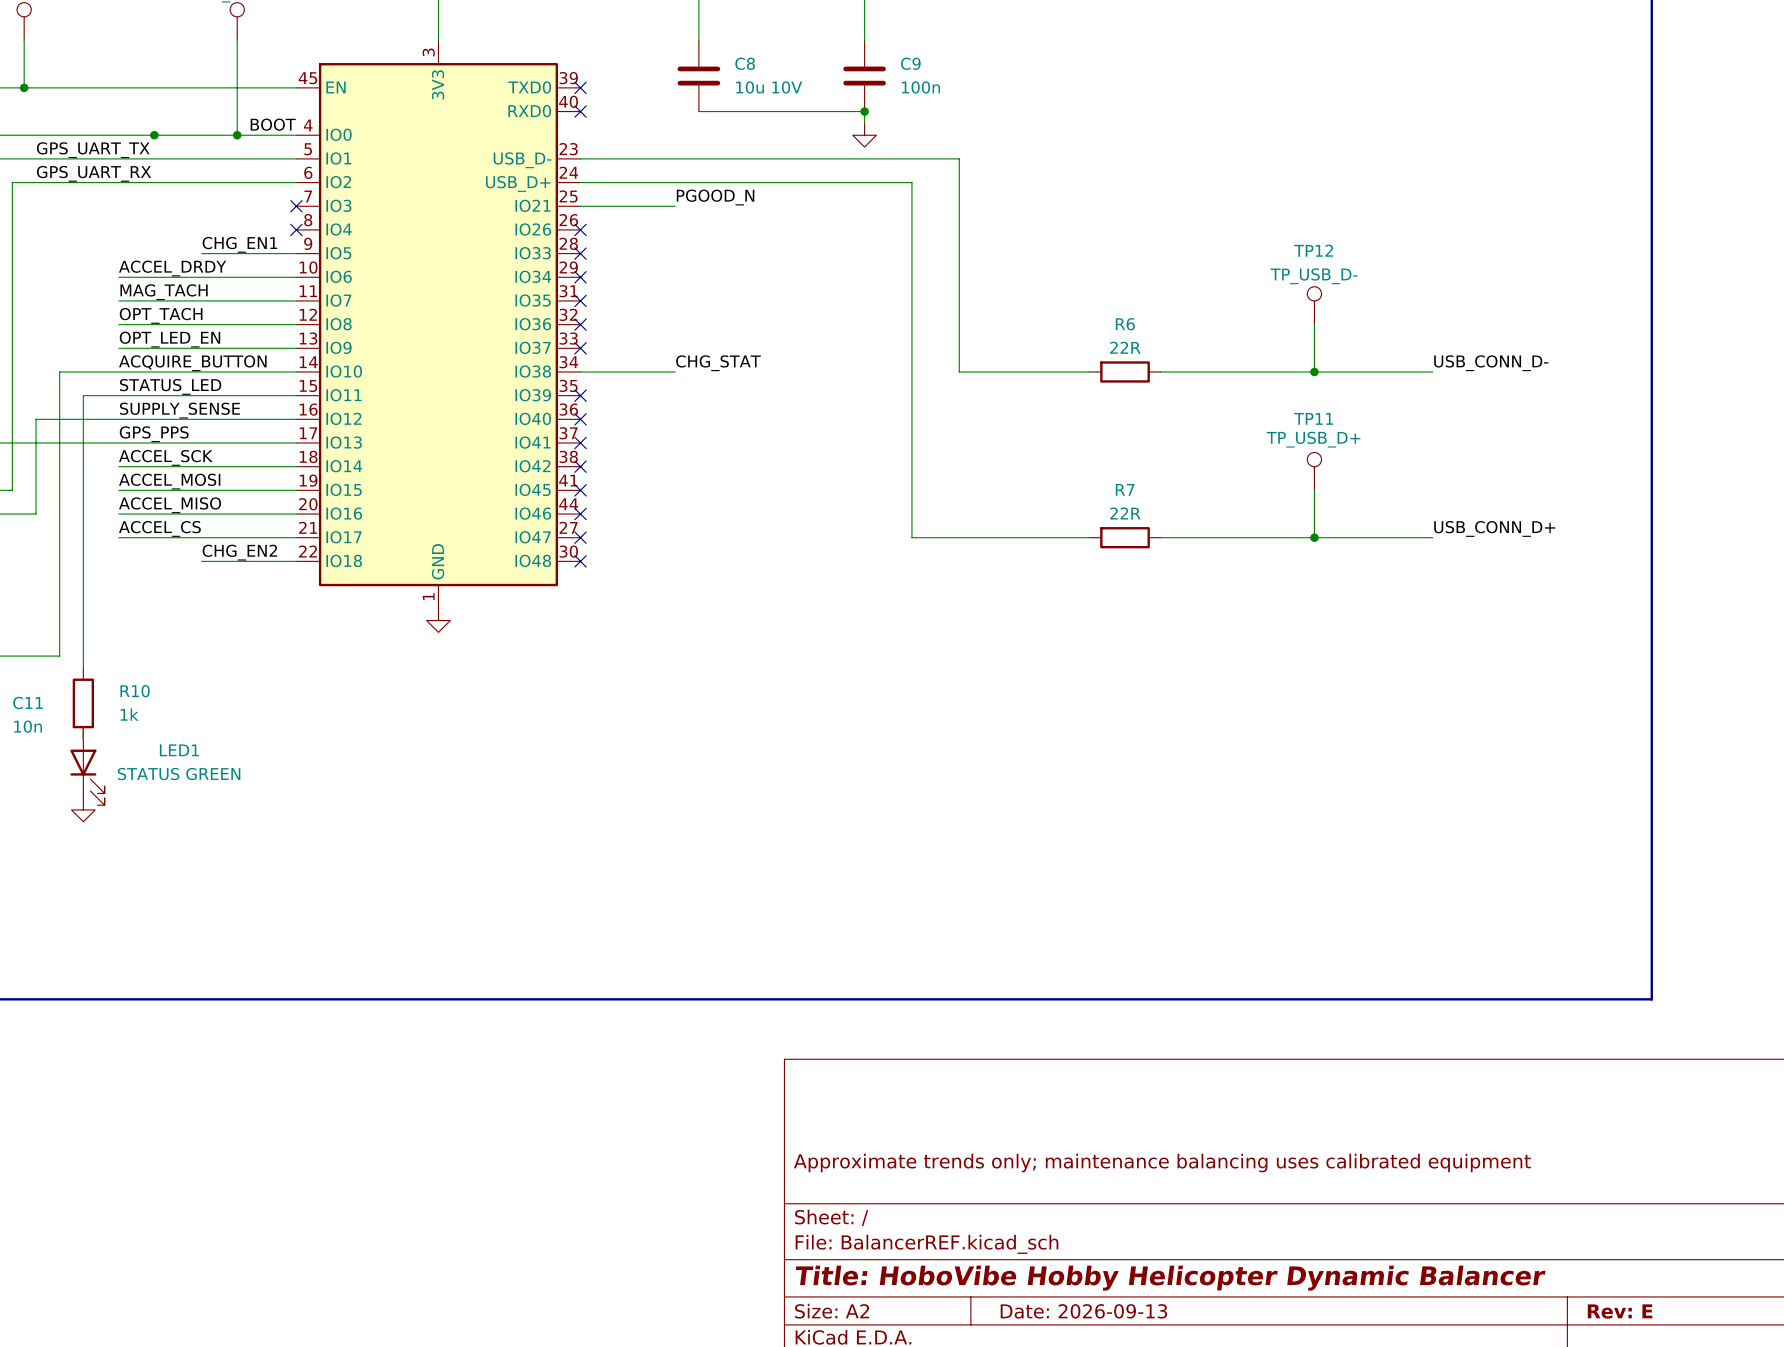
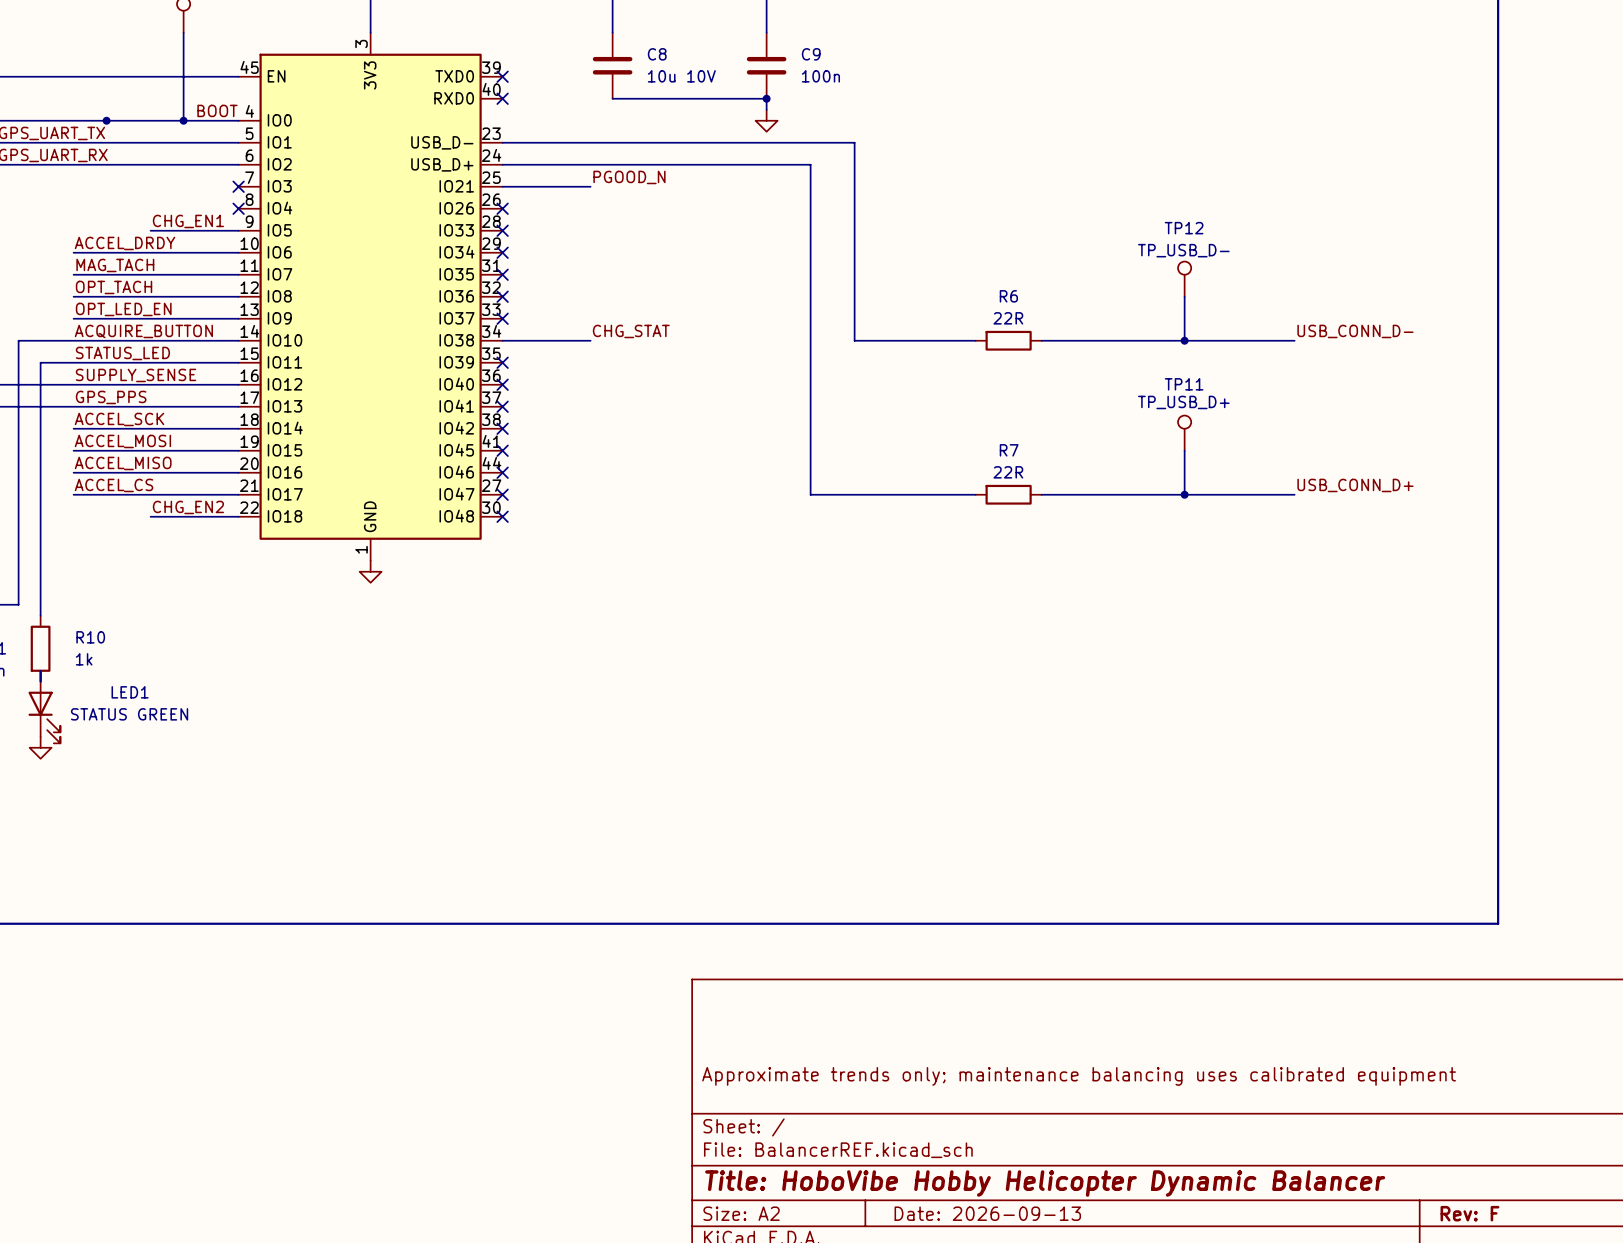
title block: Rev: E (1620, 1311) -> Rev: F (1469, 1213)

